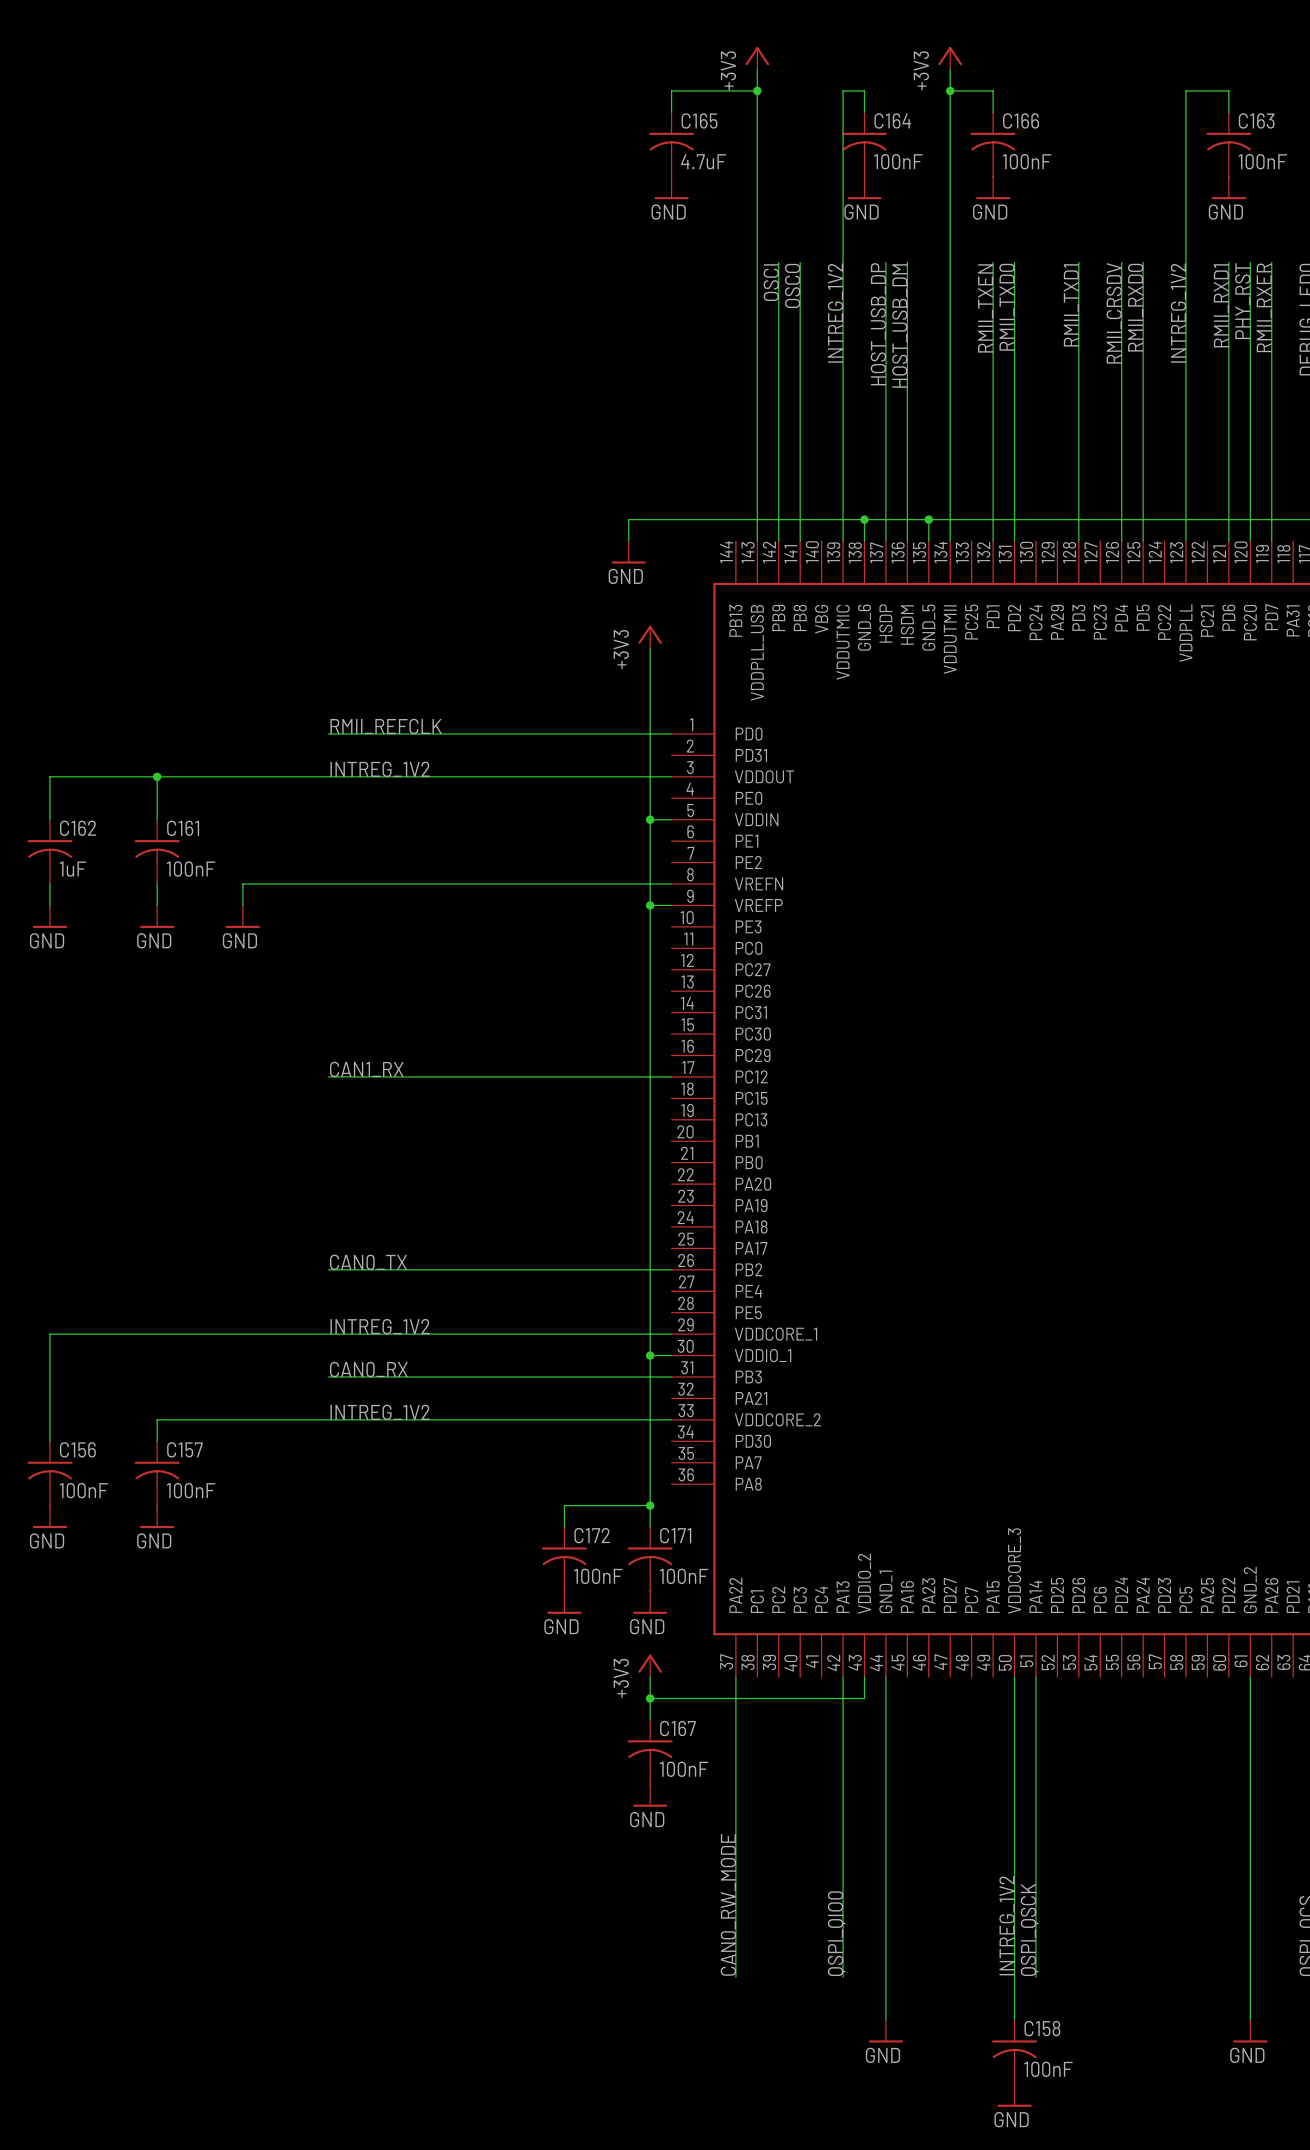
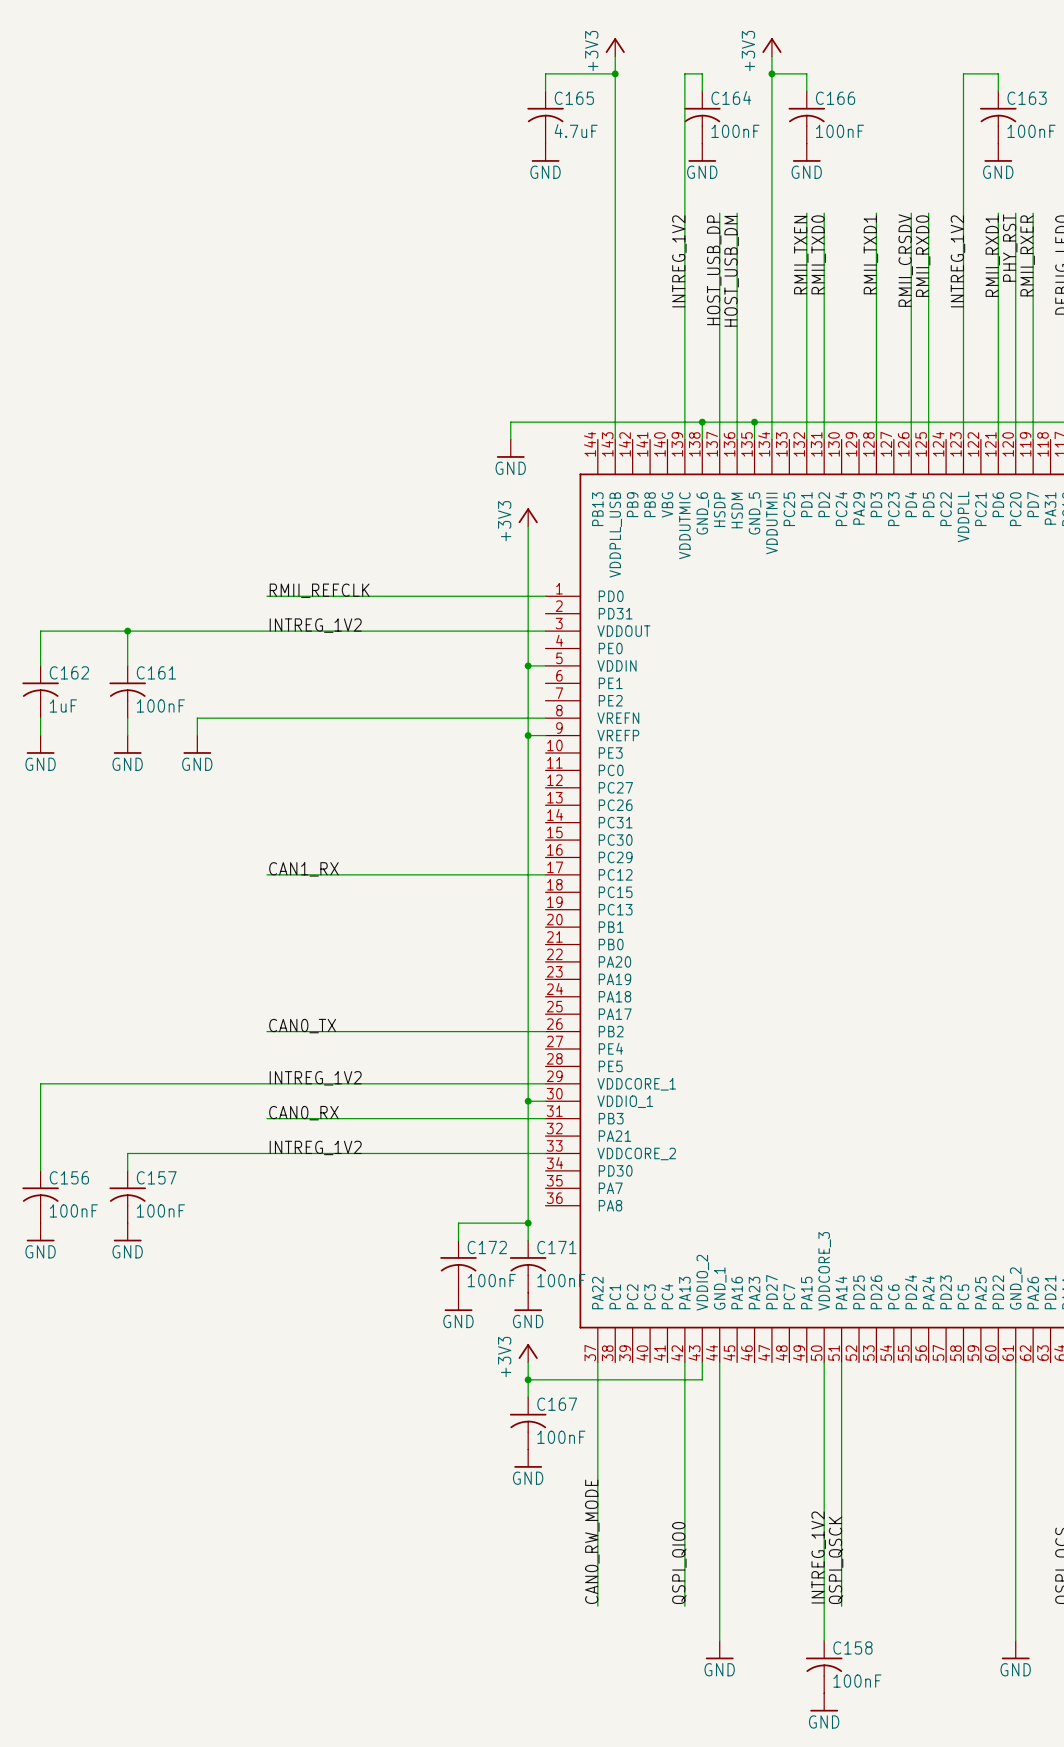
wire: (778, 262) (778, 541) -> none
wire: (800, 262) (800, 541) -> none
label: OSCI (771, 282) -> none
label: OSCO (792, 285) -> none

